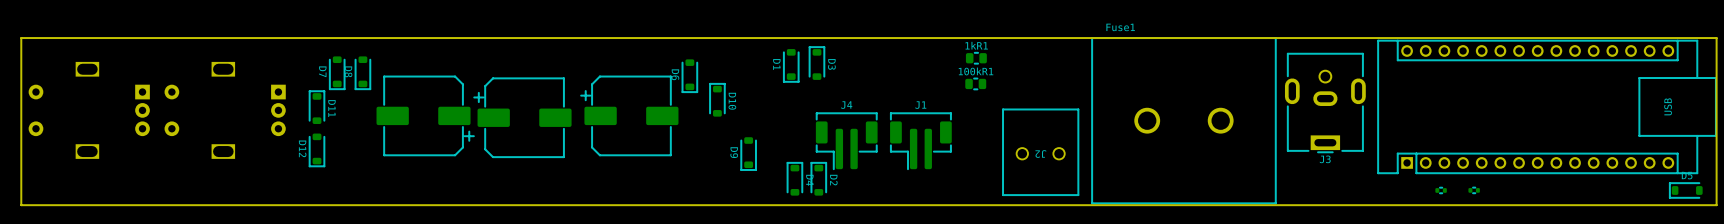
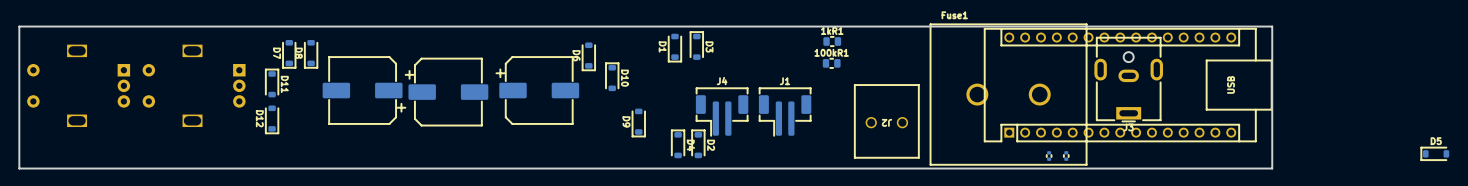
board edge: (1716, 38) (21, 38) (21, 205) (1716, 205) (1716, 38) -> (1272, 26) (1272, 168) (19, 168) (19, 26) (1272, 26)
part: (1547, 106) -> none
part: none -> (1128, 85)
part: (1441, 190) -> none
part: (1474, 190) -> none
part: none -> (1066, 155)
part: none -> (1049, 156)

